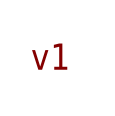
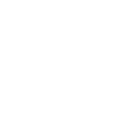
text: v1 (49, 56) -> none

